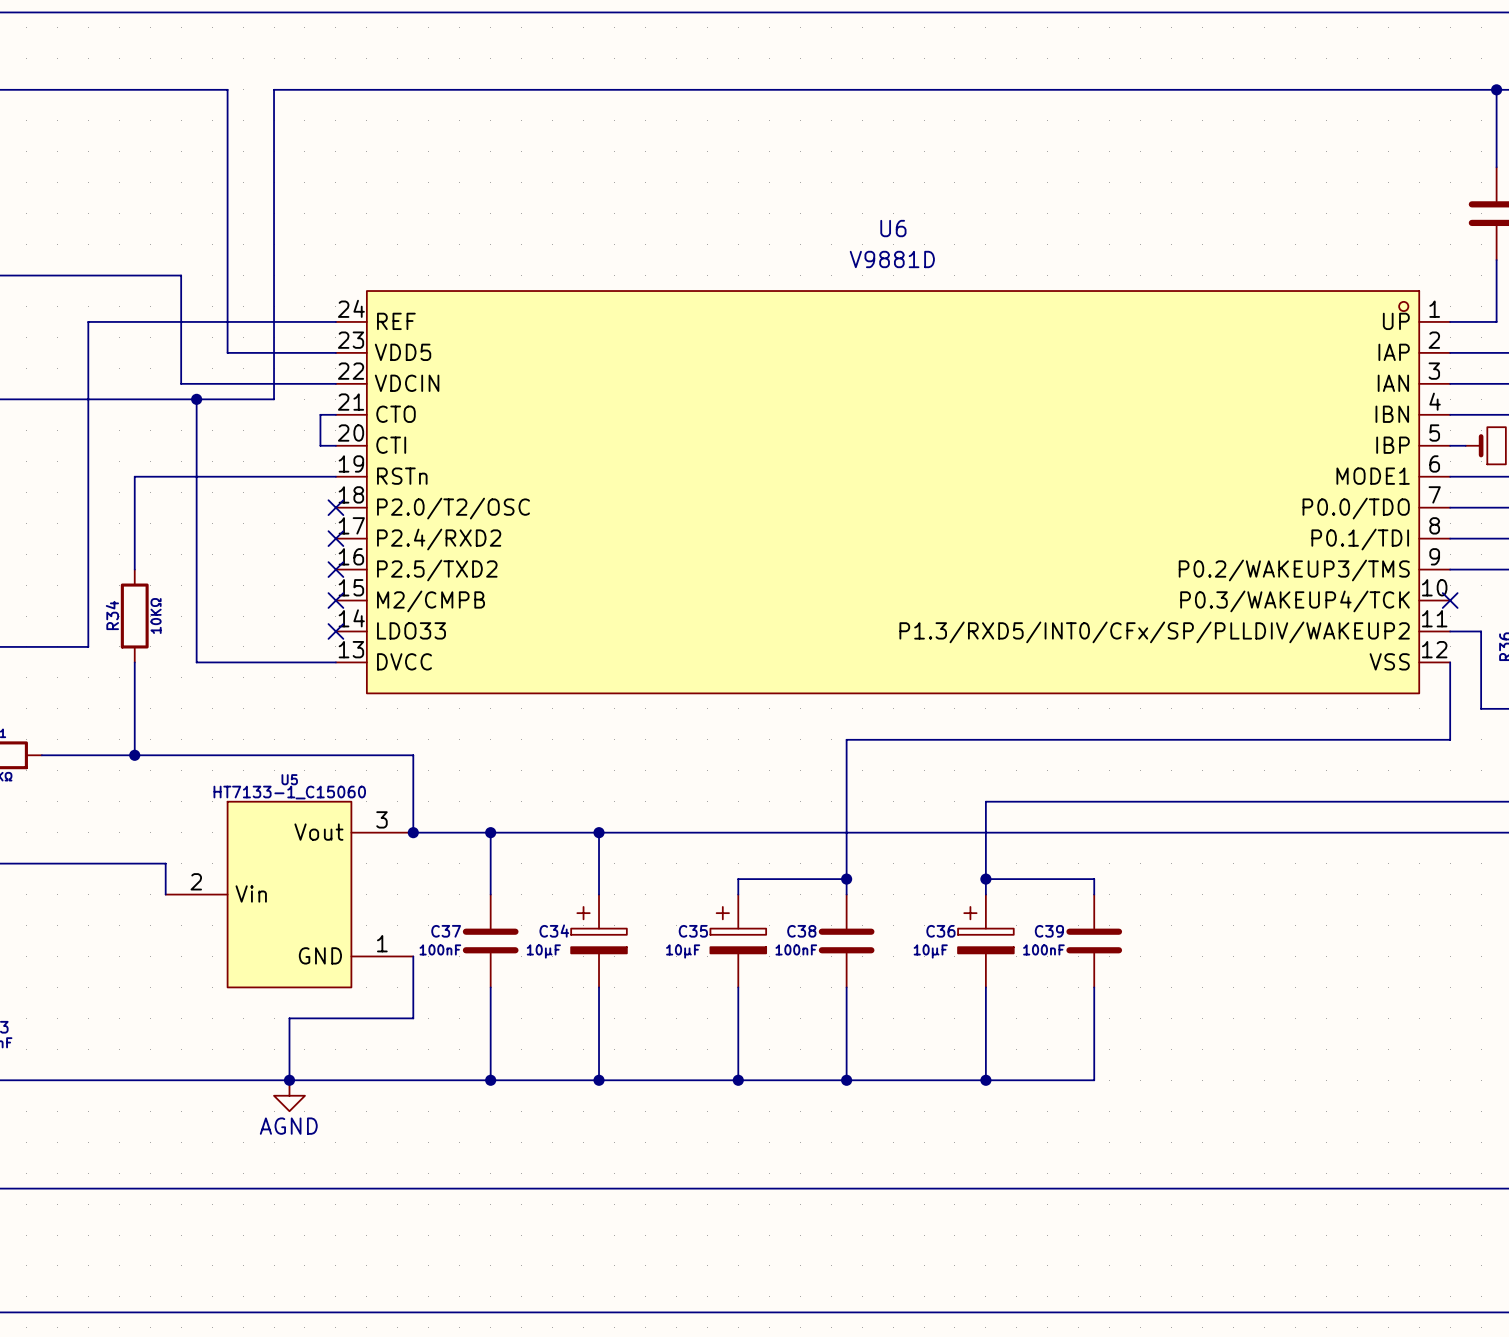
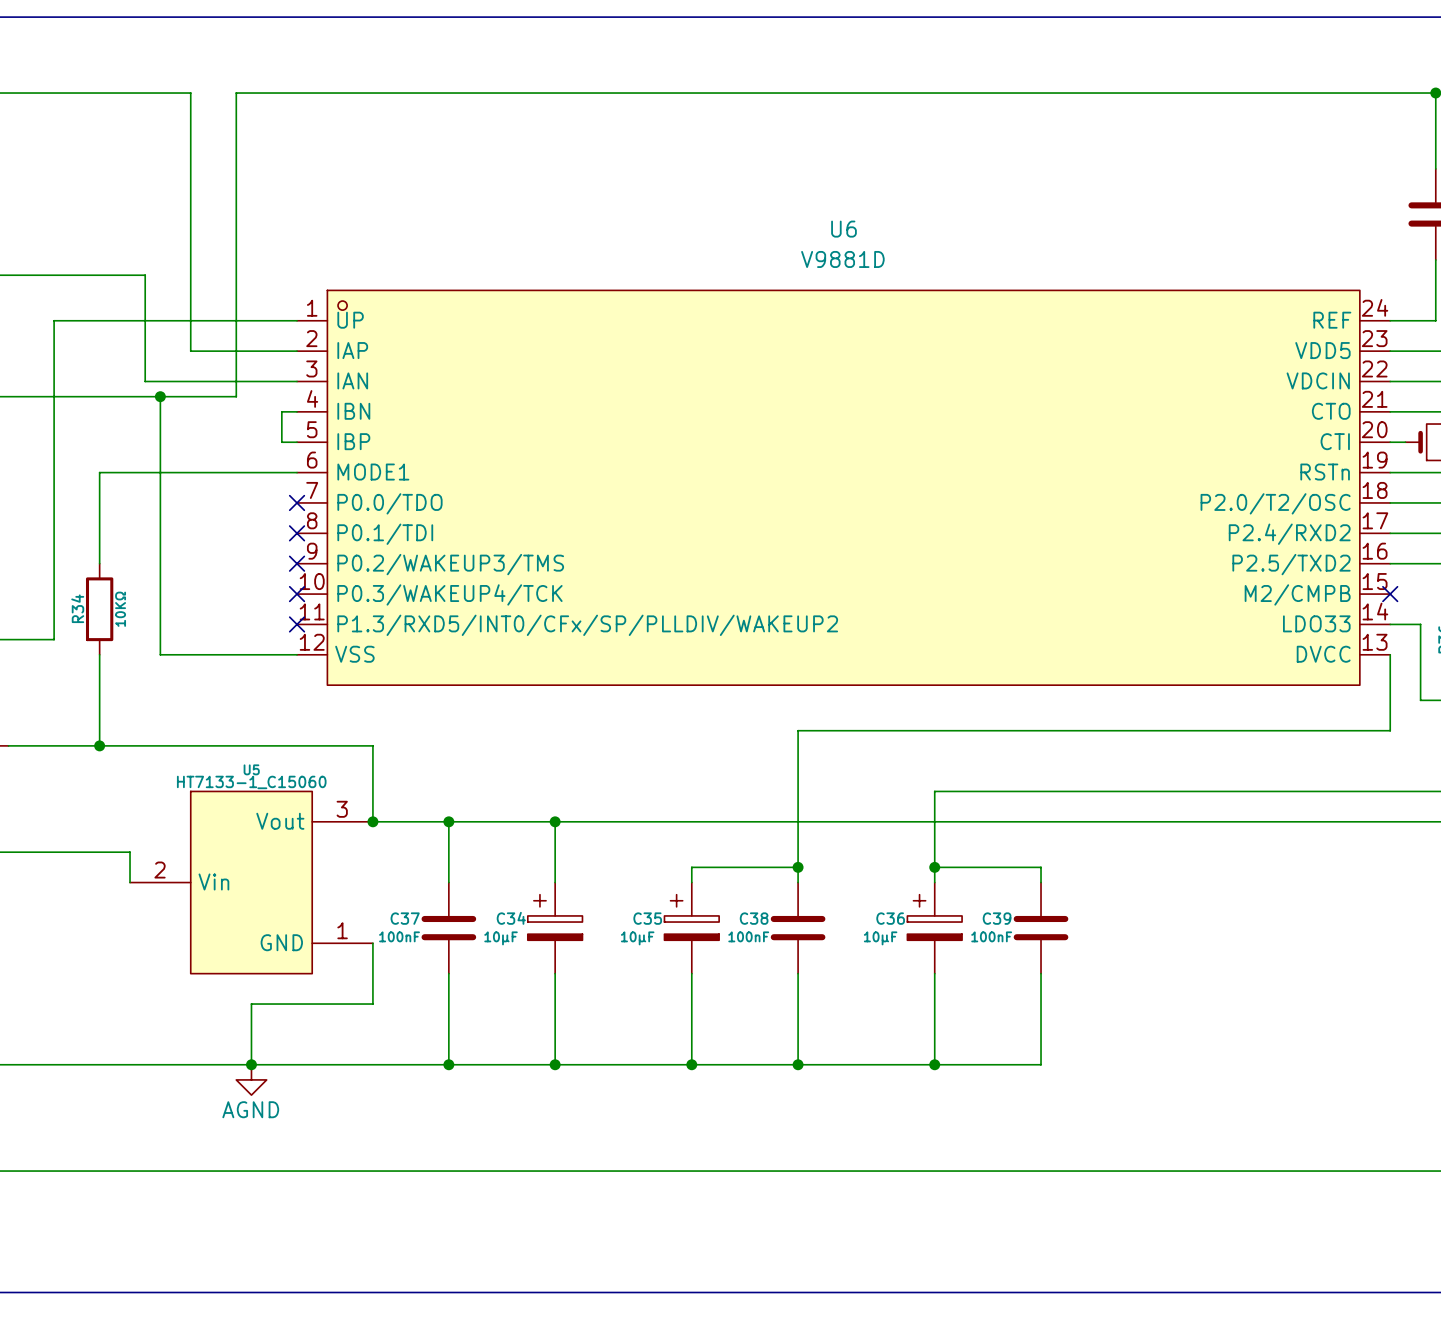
U6 flip: as is (893, 492) -> left-right (843, 487)

